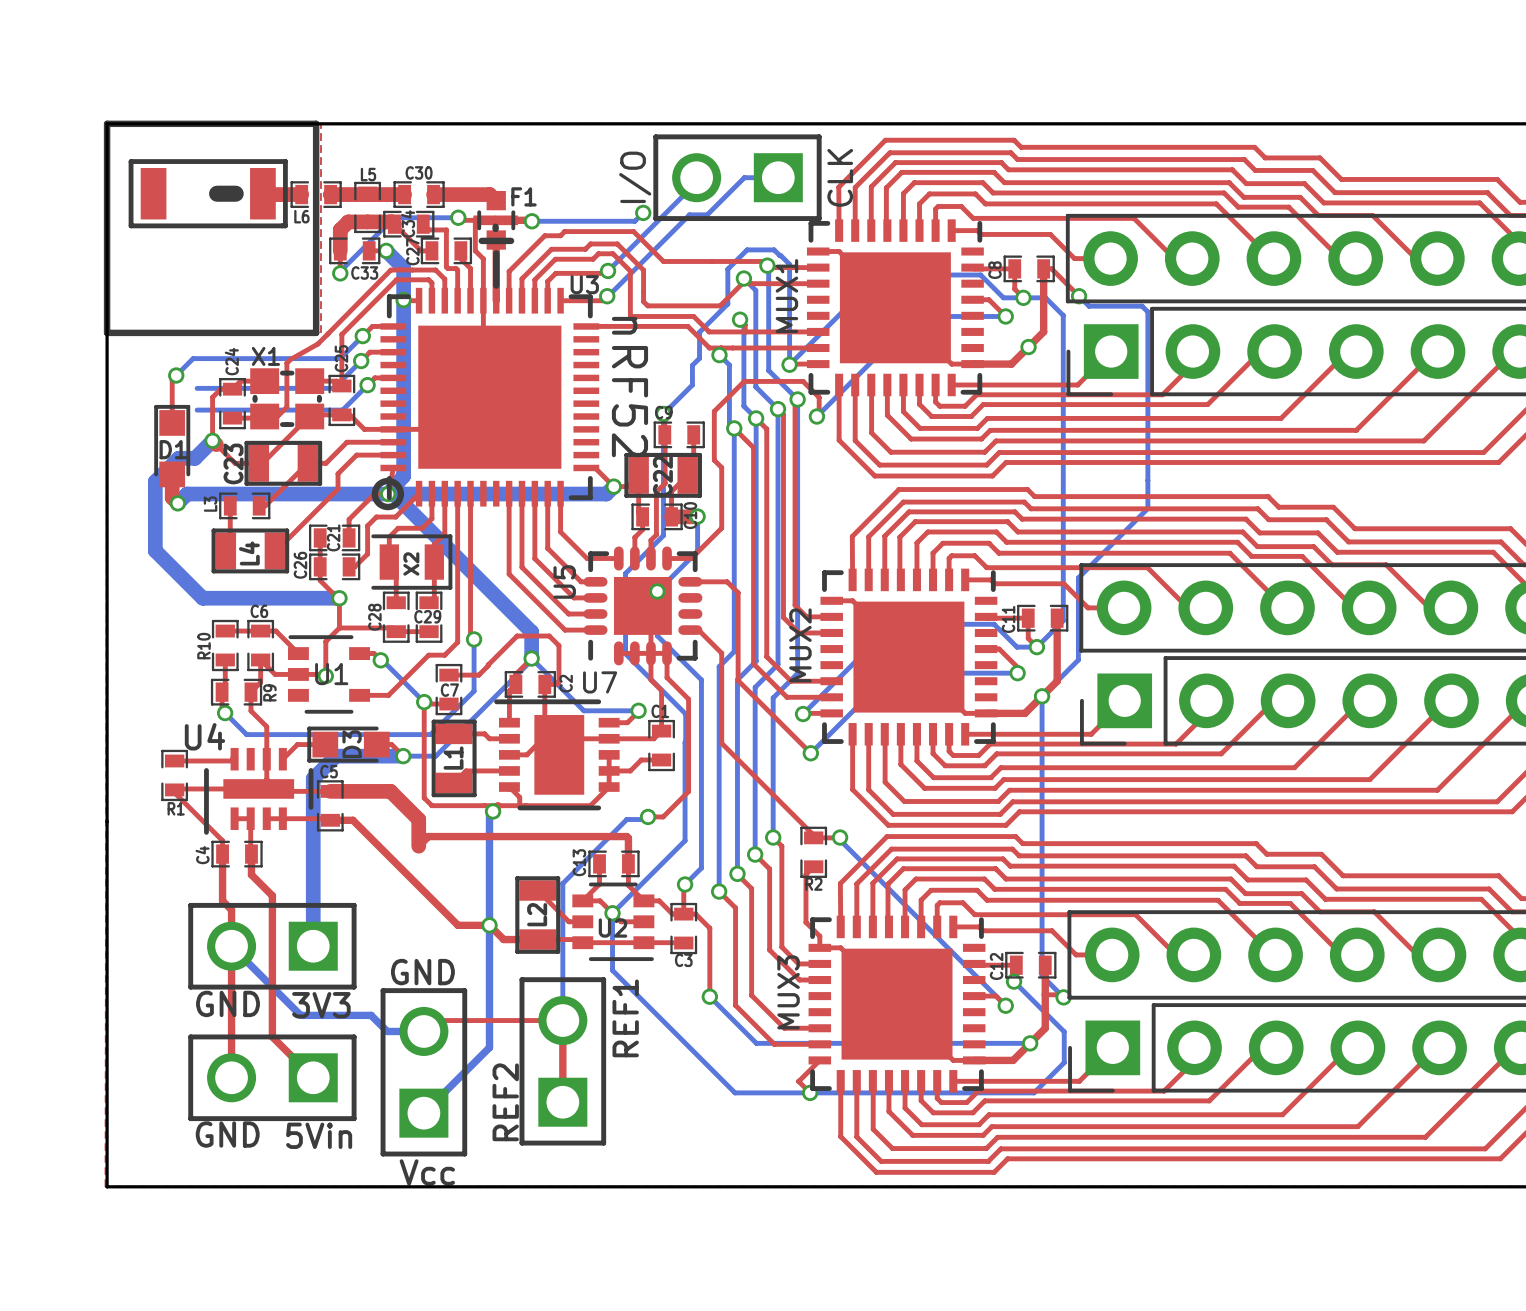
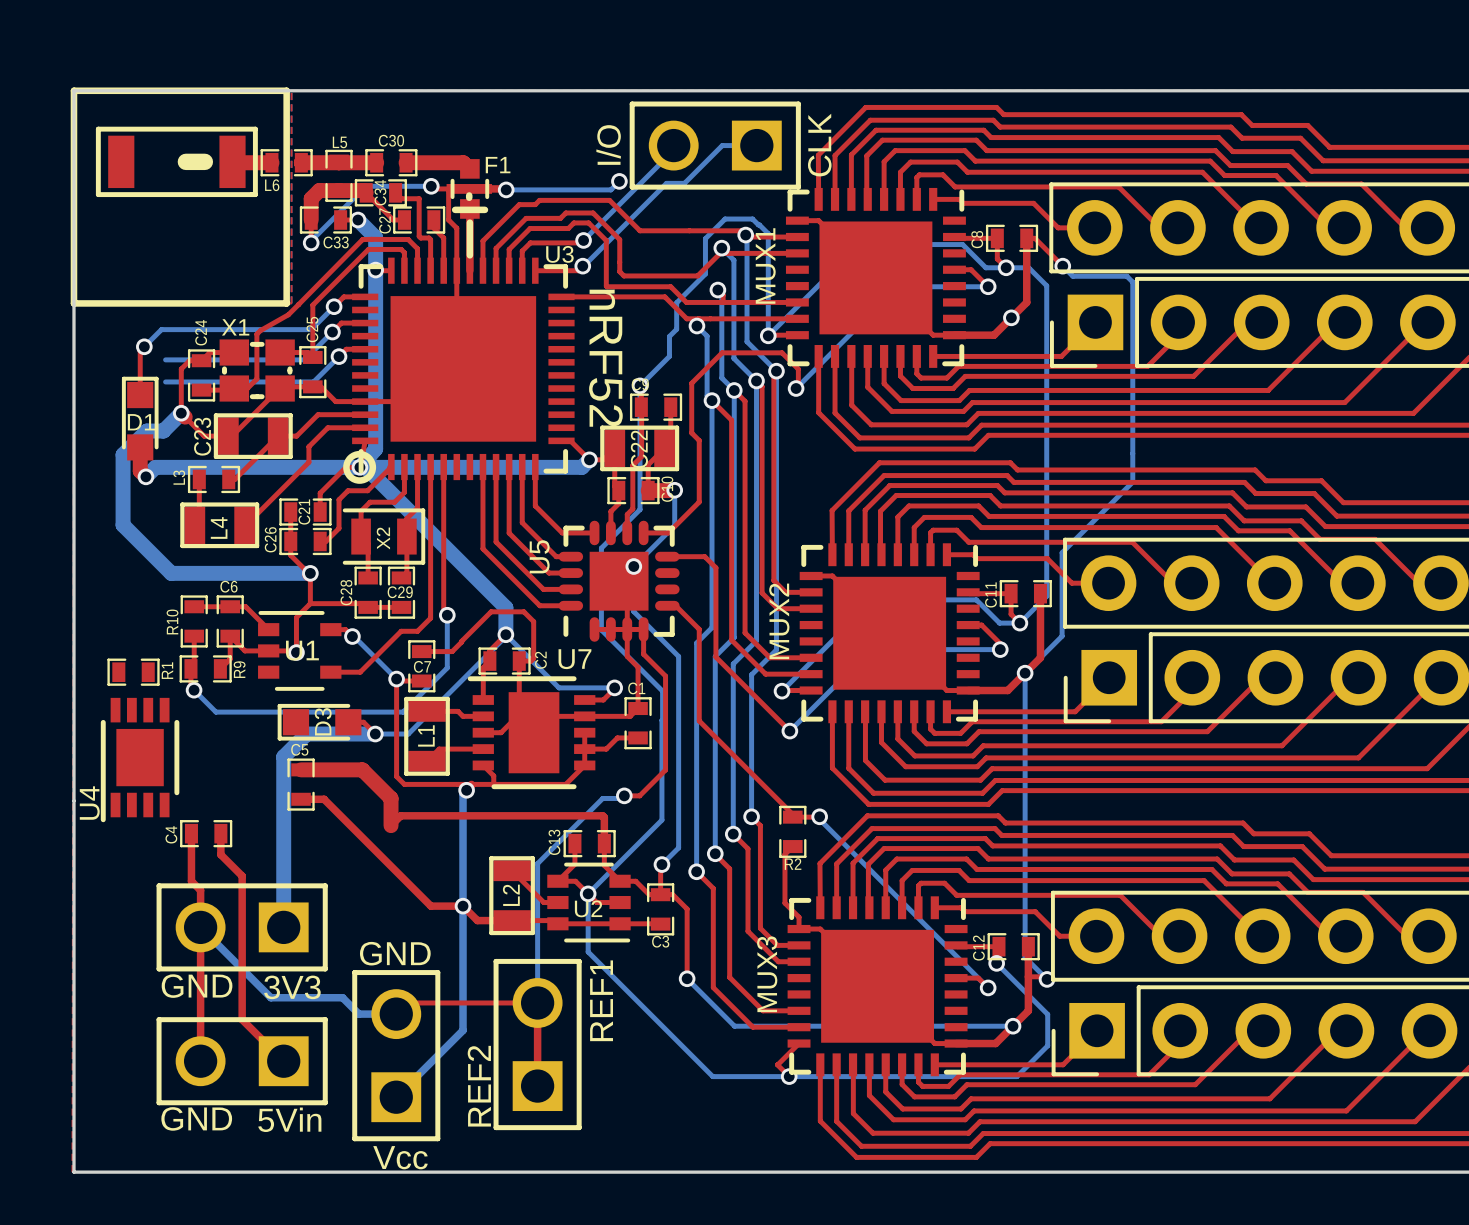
top track: (251, 692) (251, 710) (266, 726) (266, 779) (278, 791) (330, 791) -> none
U4 name position: U4 (204, 736) -> U4 (89, 803)
top track: (325, 744) (297, 744) (282, 759) -> none
U4 footprint: [204, 747, 314, 835] -> [100, 697, 180, 823]
top track: (233, 758) (232, 760) (174, 760) -> none
R1 rotation: 0° (174, 775) -> 90° clockwise (133, 672)
R1 position: (174, 775) -> (133, 672)
top track: (276, 788) (174, 789) (174, 792) (222, 840) (222, 854) -> none
top track: (234, 818) (250, 818) (250, 853) -> none
top track: (266, 818) (328, 818) -> none

